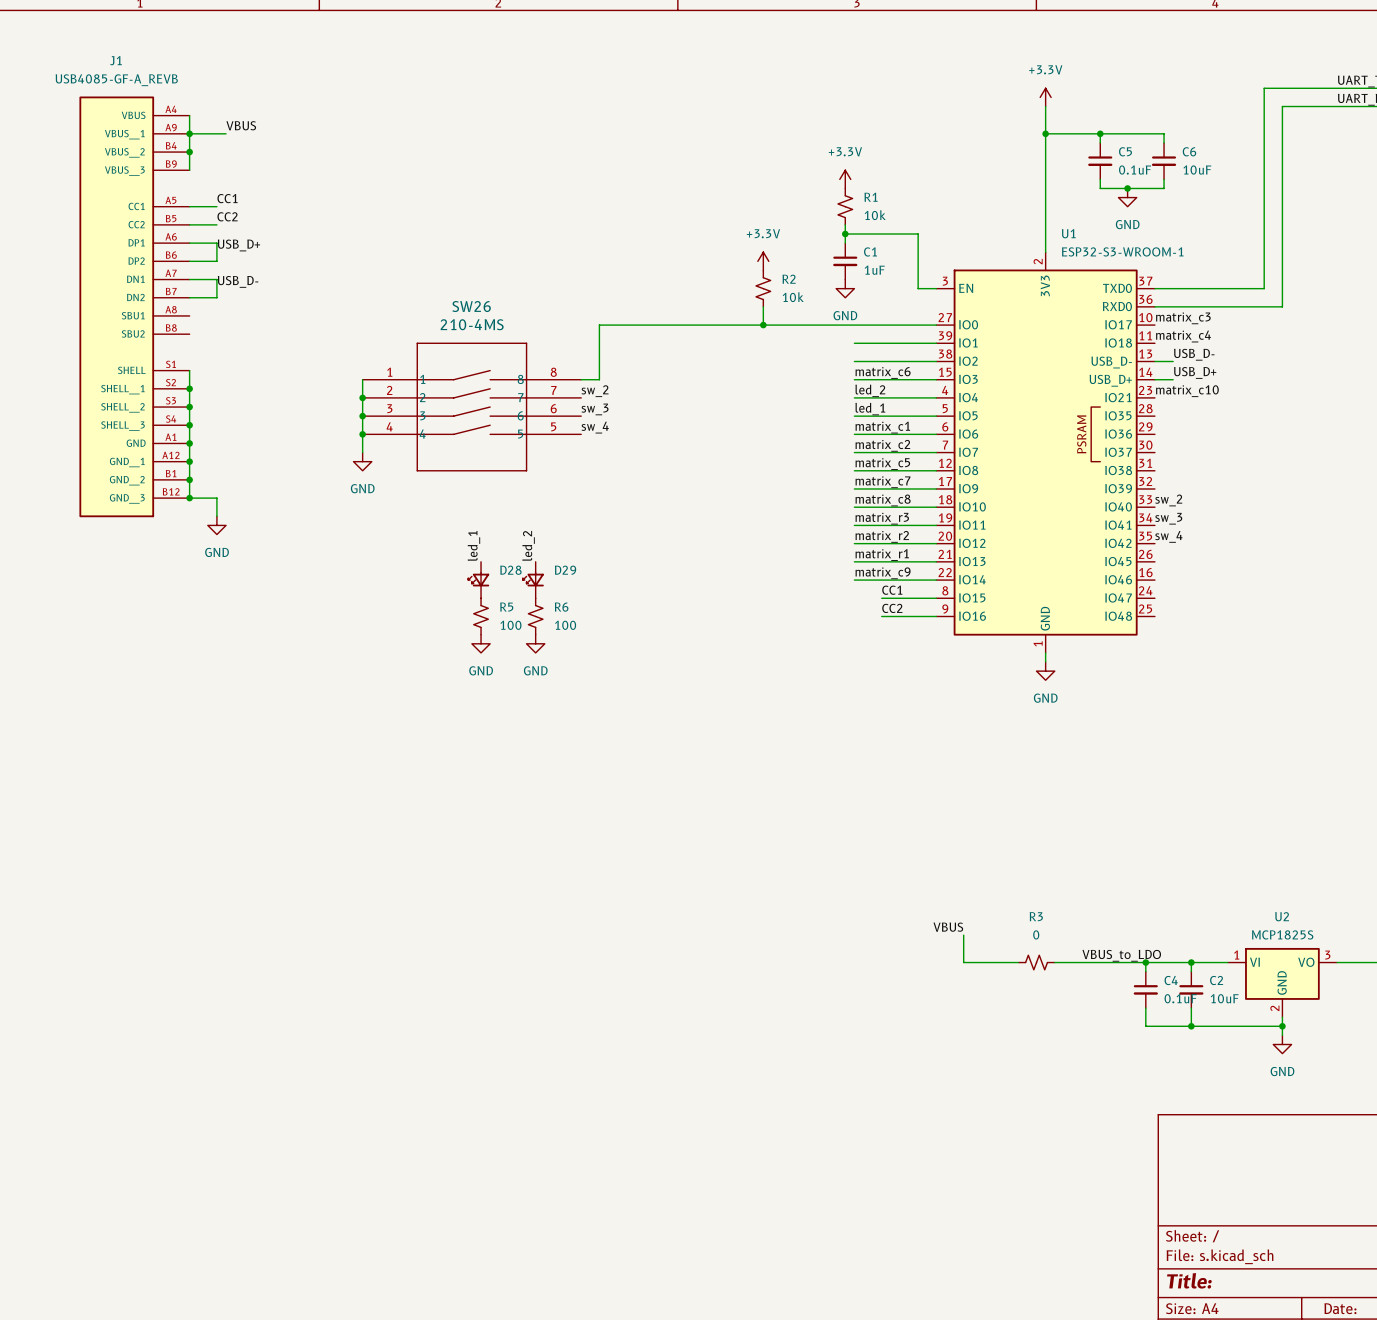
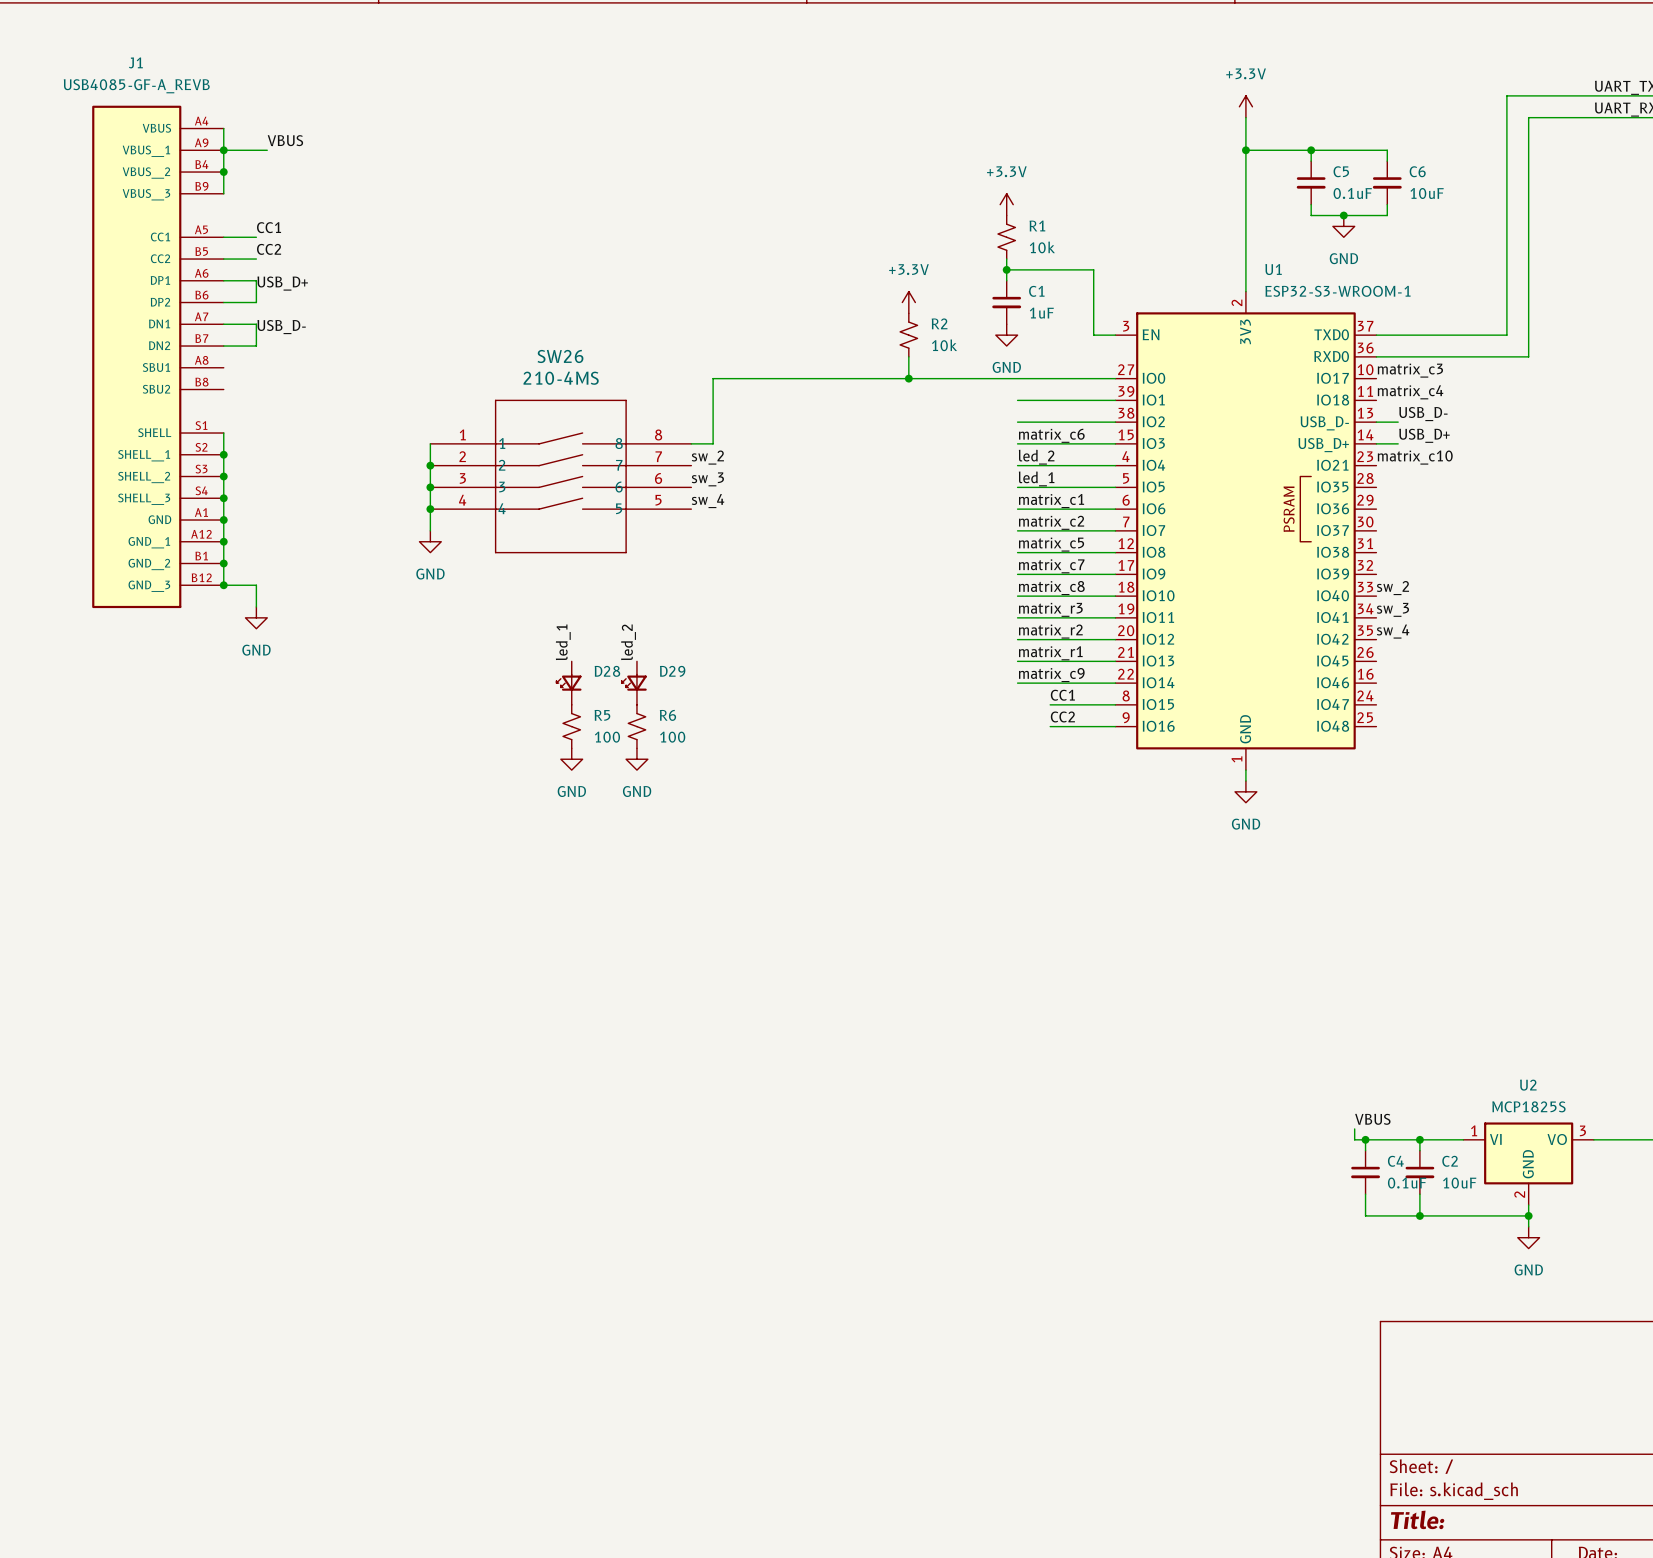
label position: VBUS (948, 927) -> VBUS (1372, 1119)
wire: (963, 935) (963, 962) (1018, 962) -> none
label: VBUS_to_LDO (1121, 955) -> none
R3: 0 (1036, 962) -> none
wire: (1054, 962) (1136, 962) -> (1354, 1128) (1354, 1139)

